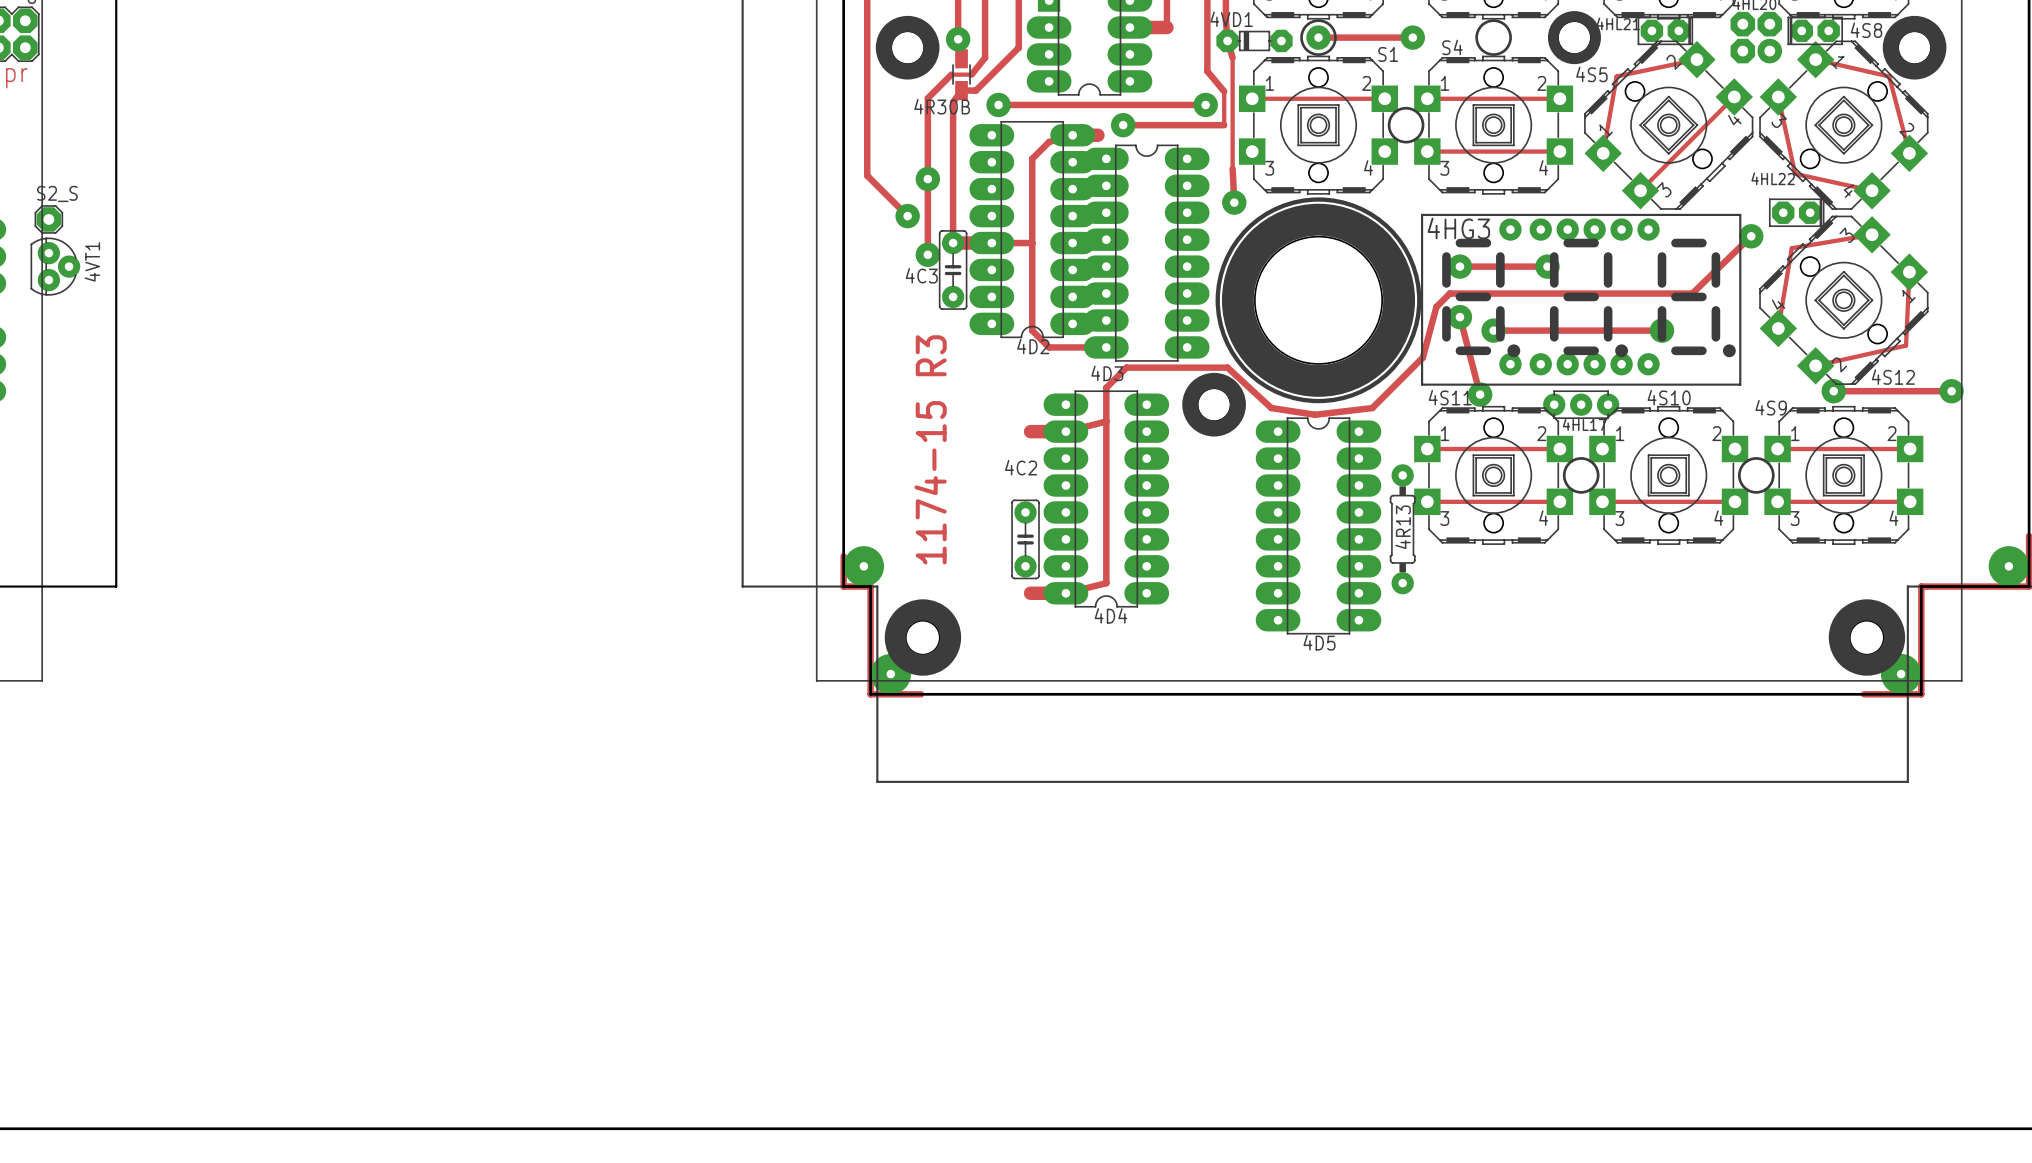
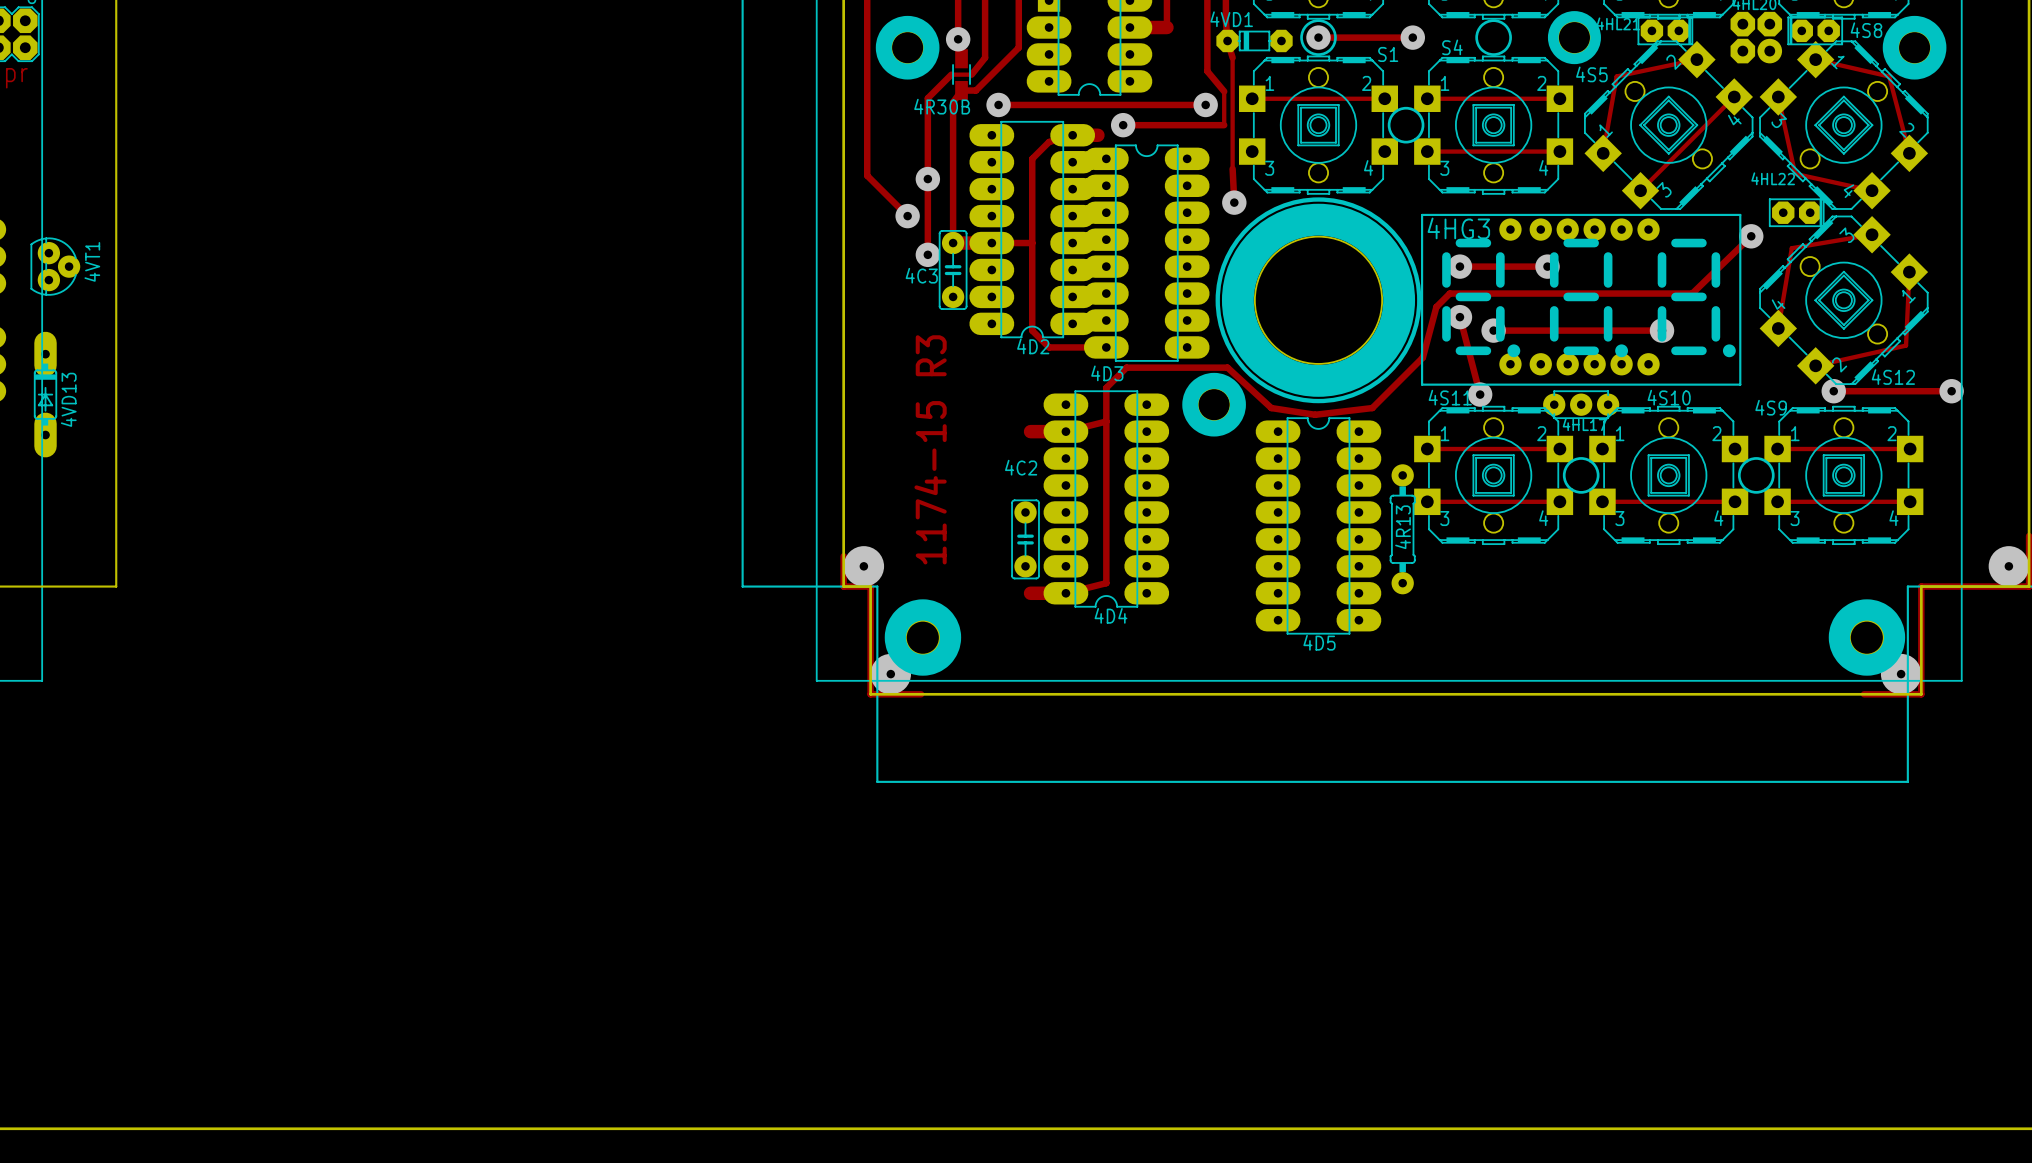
S2_S: (48, 219) -> none
4VD13: none -> (45, 394)

